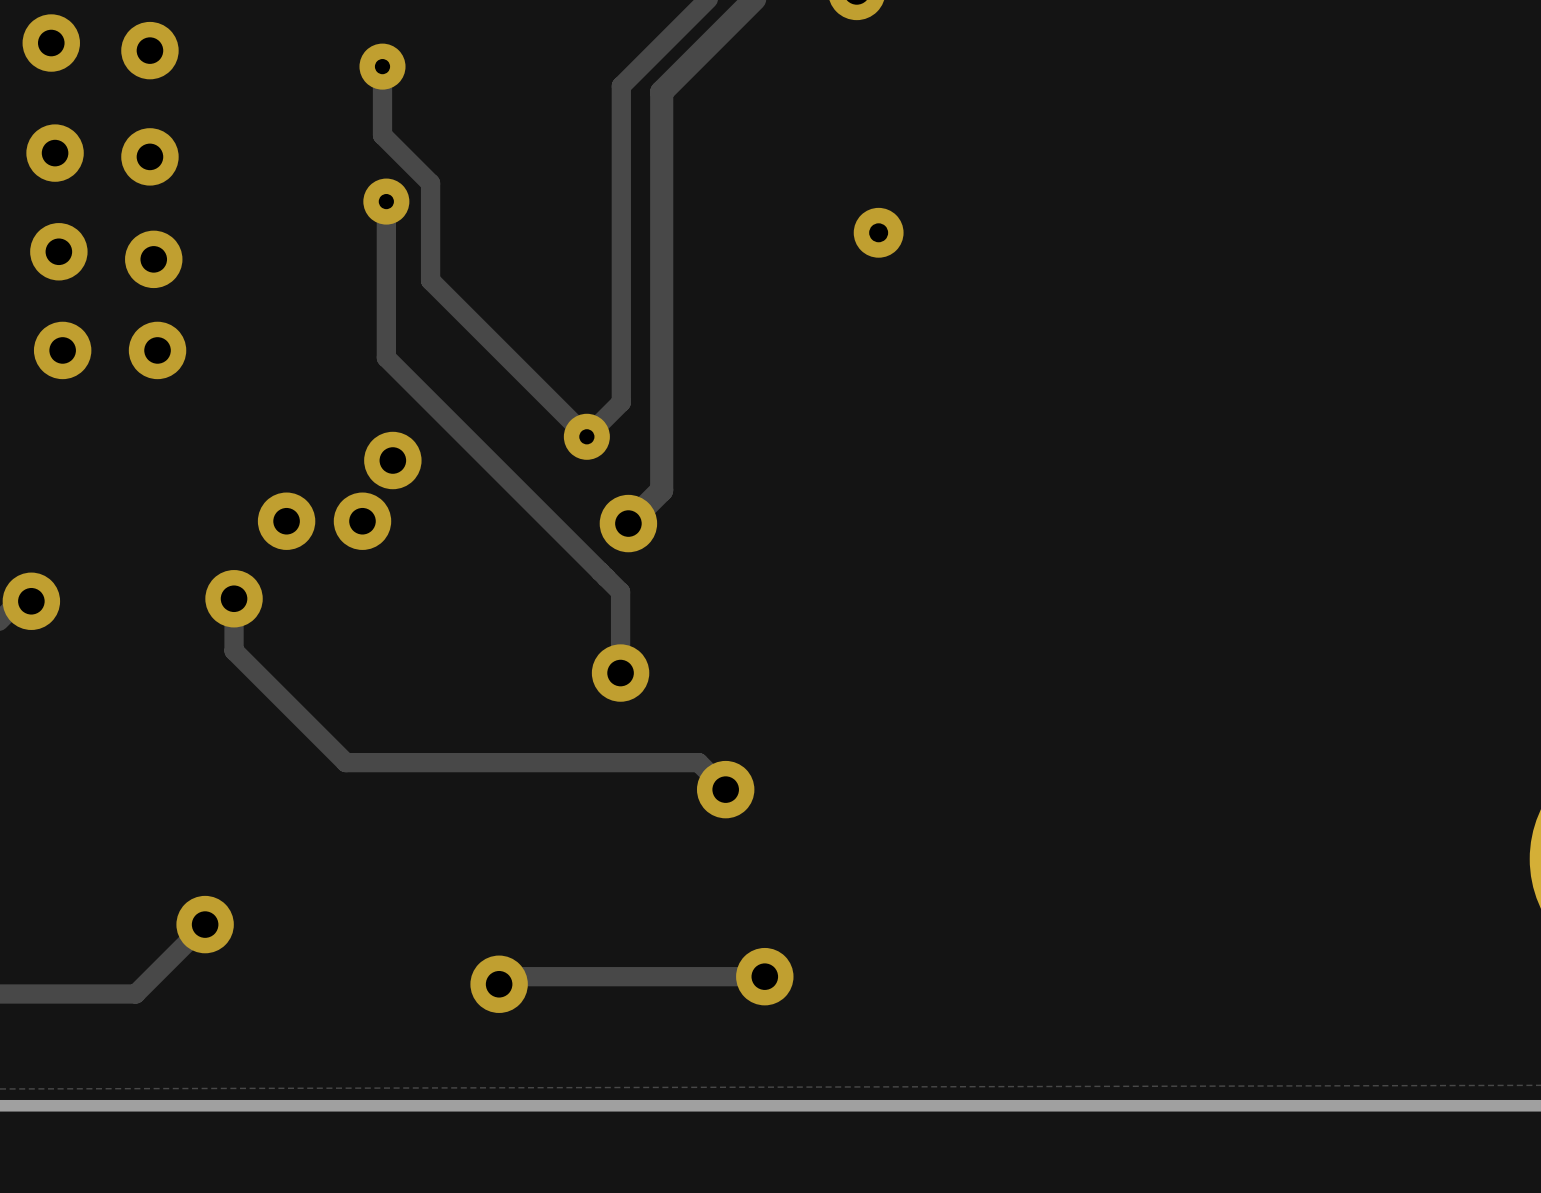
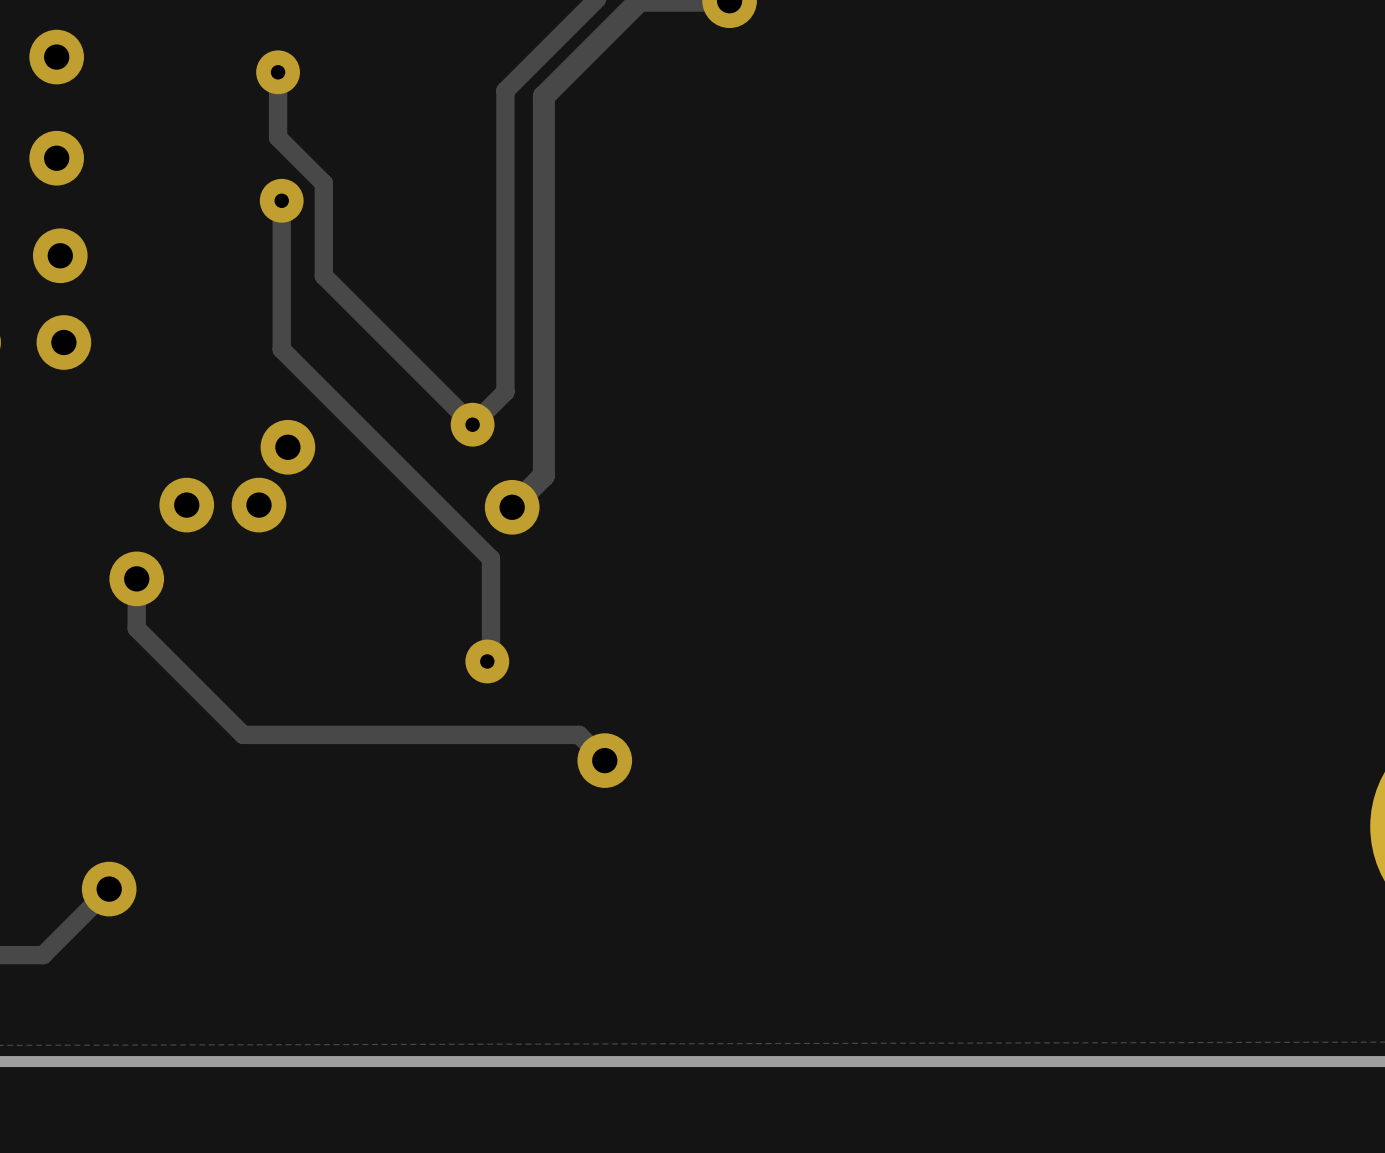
via: (878, 232) -> none
track: (606, 577) (620, 591) (620, 673) -> (490, 558) (490, 659) (487, 661)
via size: [591, 644, 650, 702] -> [465, 639, 510, 684]
track: (764, 976) (506, 976) (499, 984) -> none
via: (764, 976) -> none
via: (499, 984) -> none

